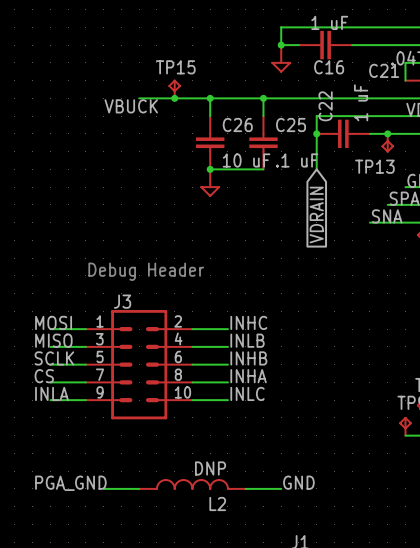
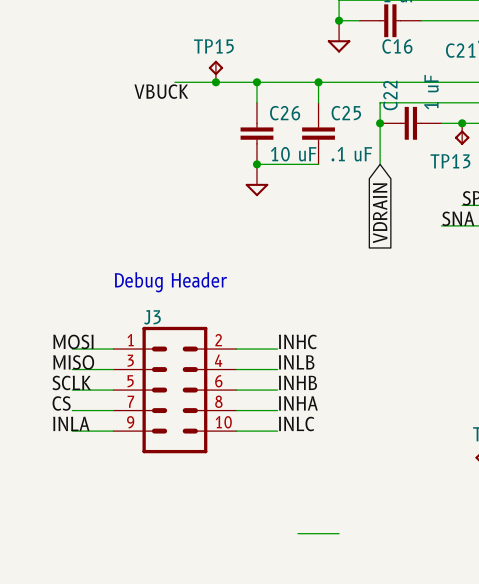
label: GND (298, 482) -> none
label: PGA_GND (70, 483) -> none
L2: DNP (192, 484) -> none
wire: (103, 488) (139, 488) -> none

